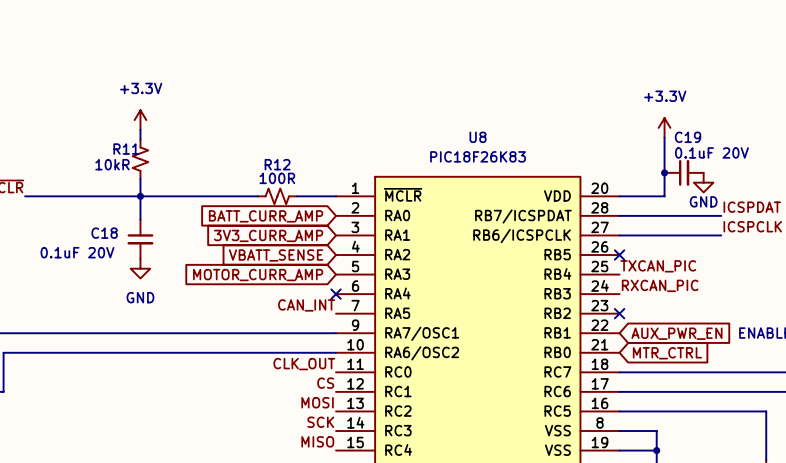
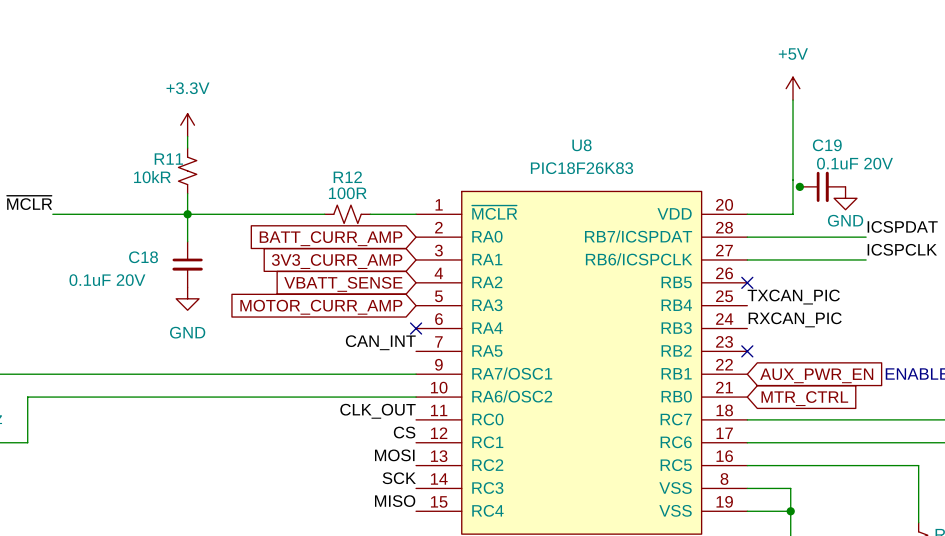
power symbol: none -> +5V (793, 88)
power symbol: +3.3V (664, 127) -> none
wire: (664, 137) (664, 196) (658, 196) -> (793, 100) (793, 214)

